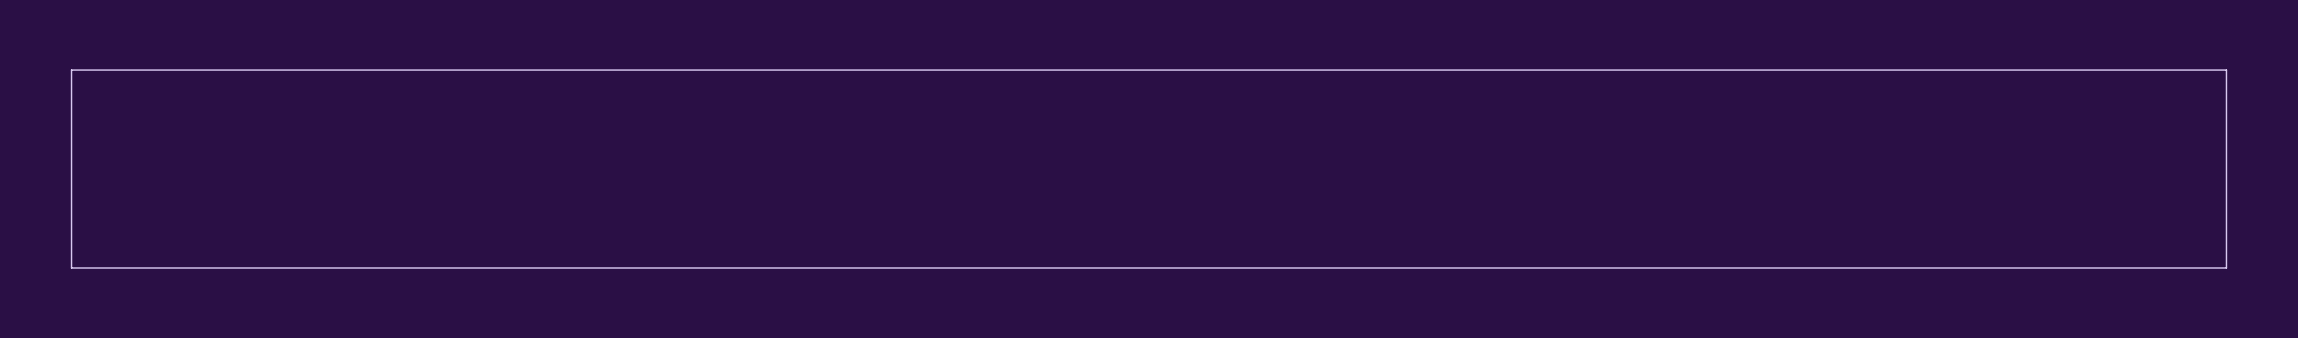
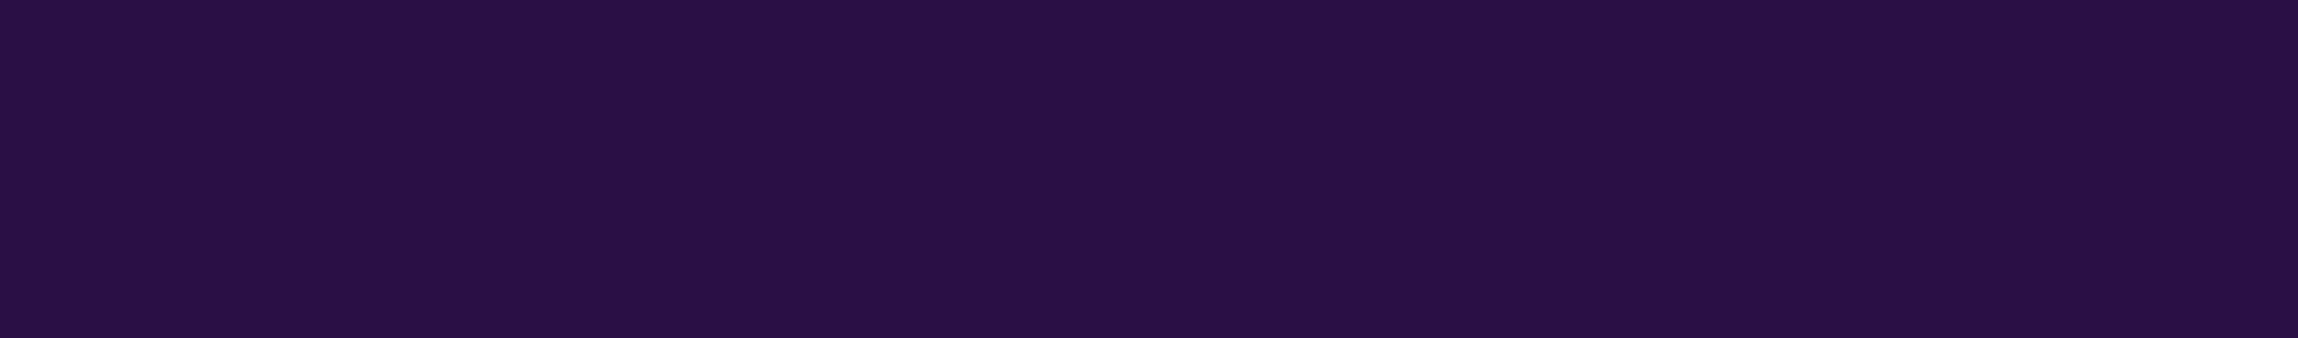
board edge: (71, 70) (2226, 70) (2226, 268) (71, 268) (71, 70) -> none

